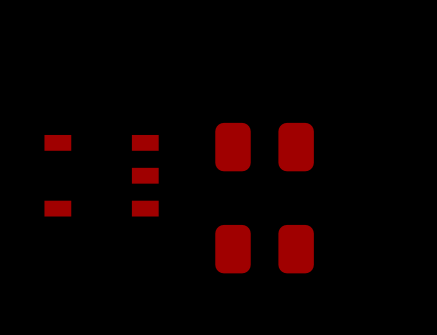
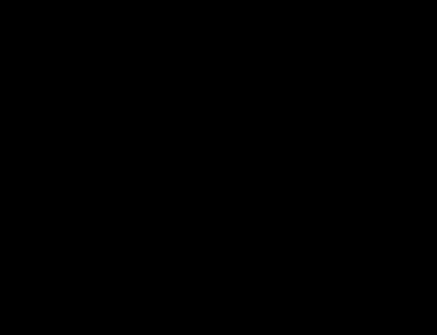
part: (264, 147) -> none
part: (101, 175) -> none
part: (264, 249) -> none

